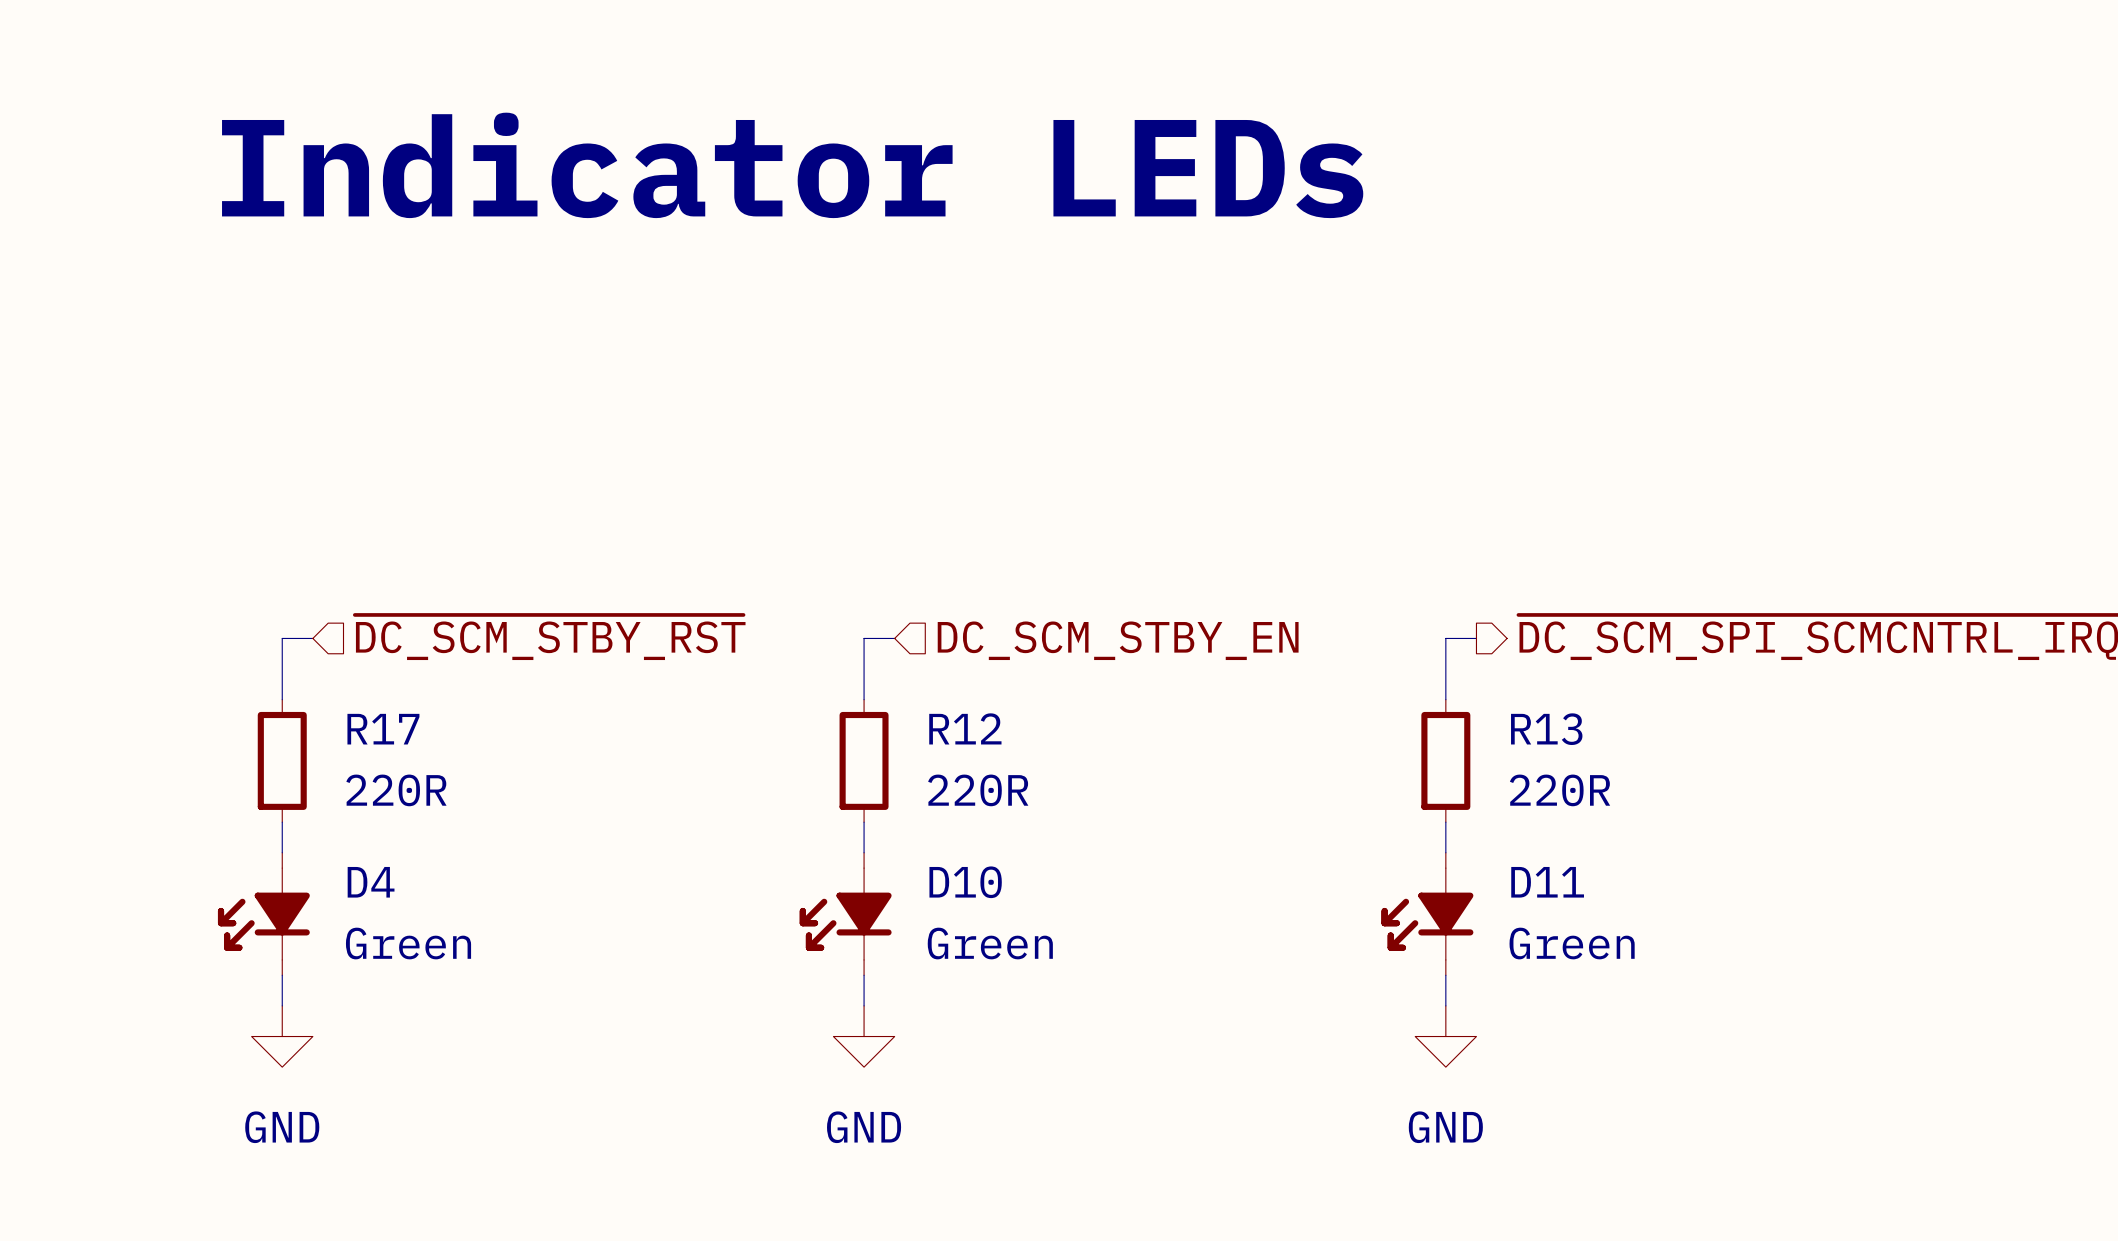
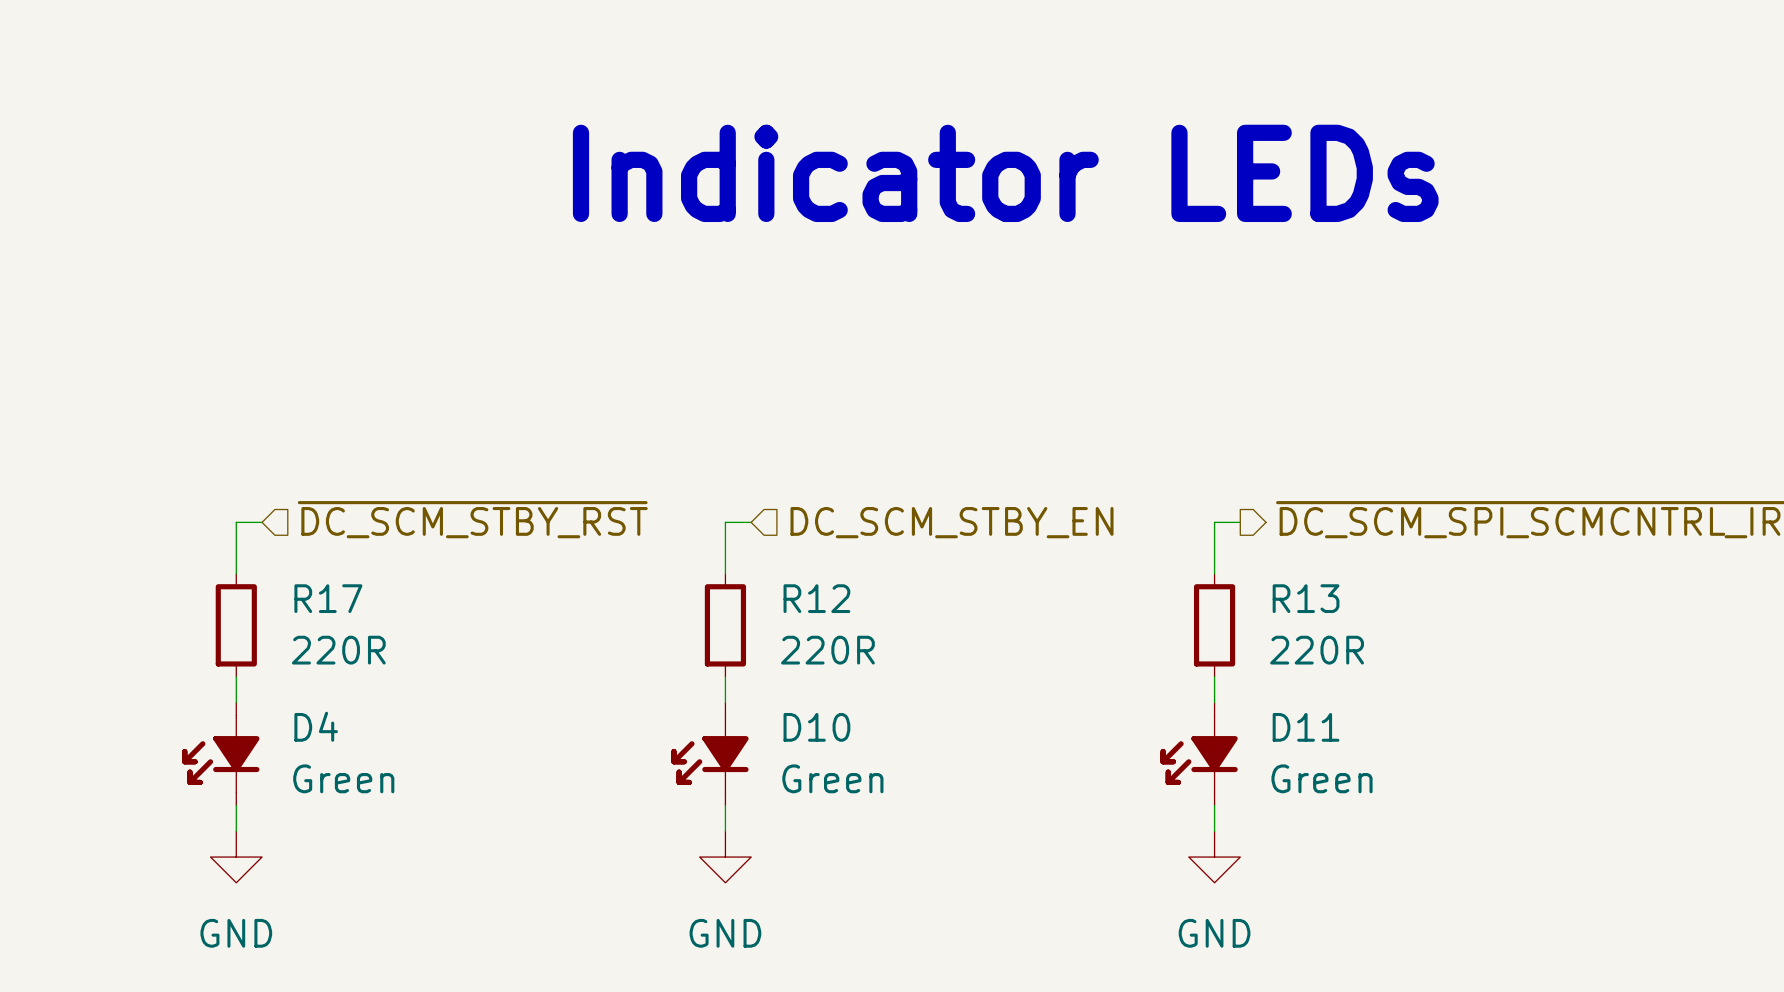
text position: Indicator LEDs (792, 165) -> Indicator LEDs (1005, 173)

